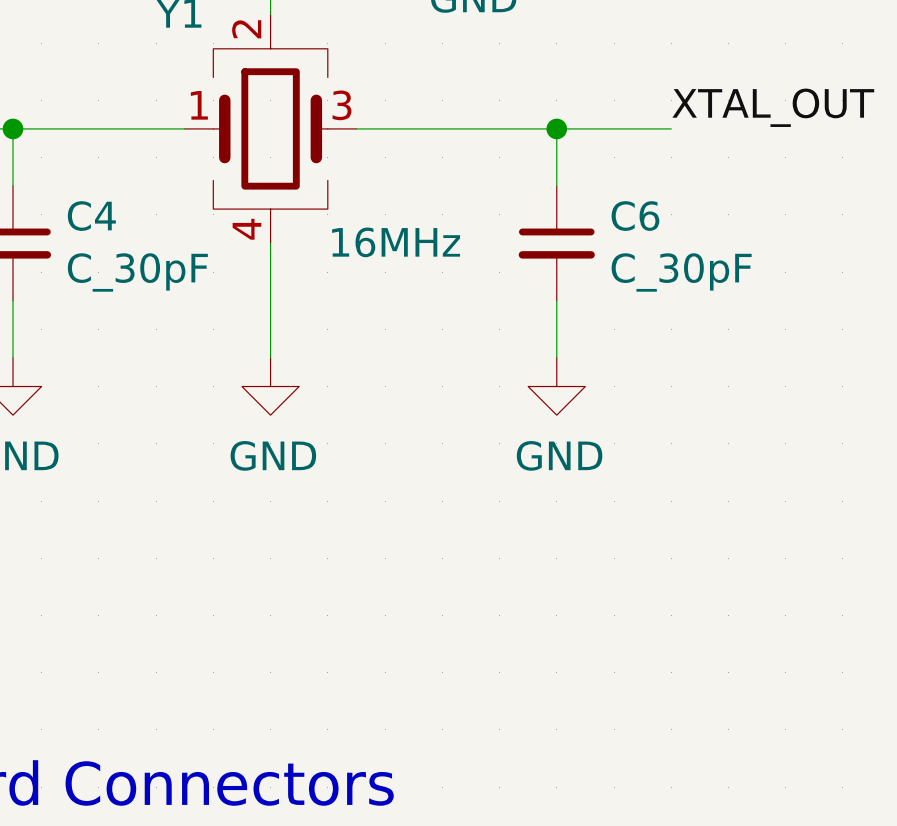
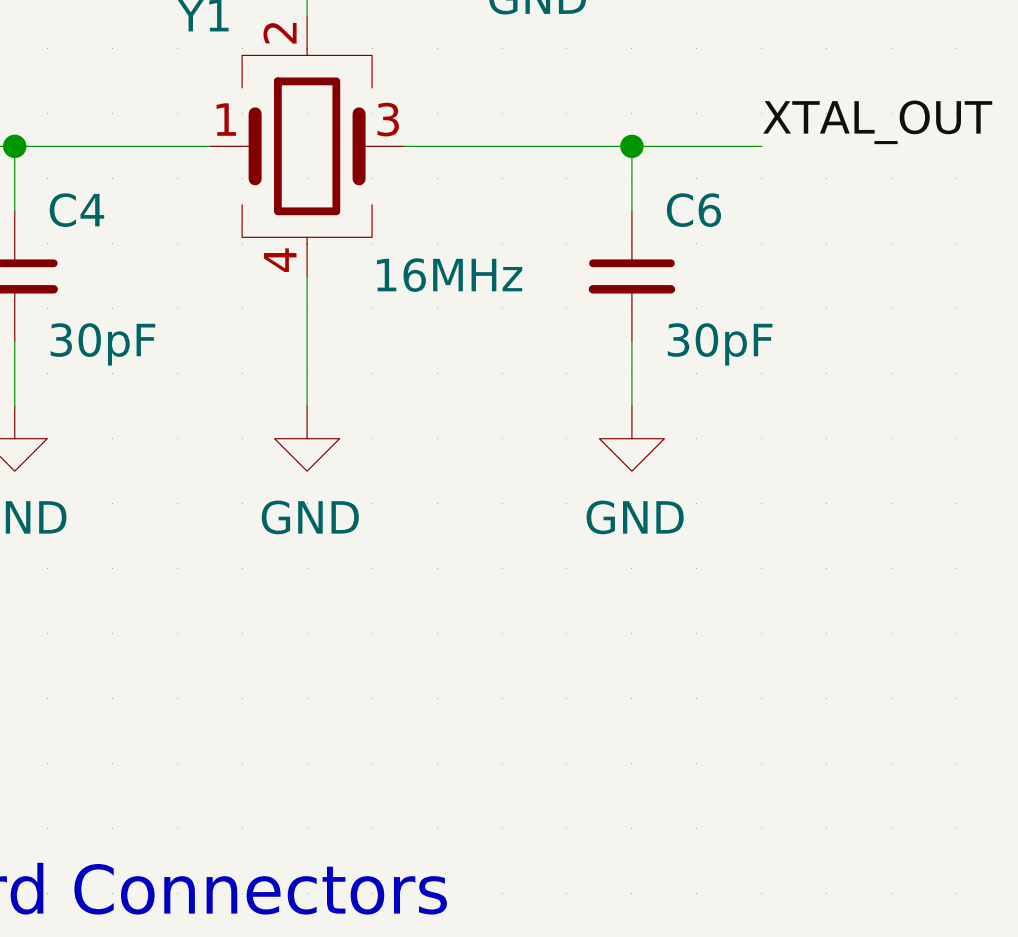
C4 name position: C4 (91, 216) -> C4 (76, 210)
C6 name position: C6 (635, 216) -> C6 (693, 210)
C4 value: C_30pF (137, 272) -> 30pF (102, 344)
C6 value: C_30pF (681, 272) -> 30pF (720, 344)

